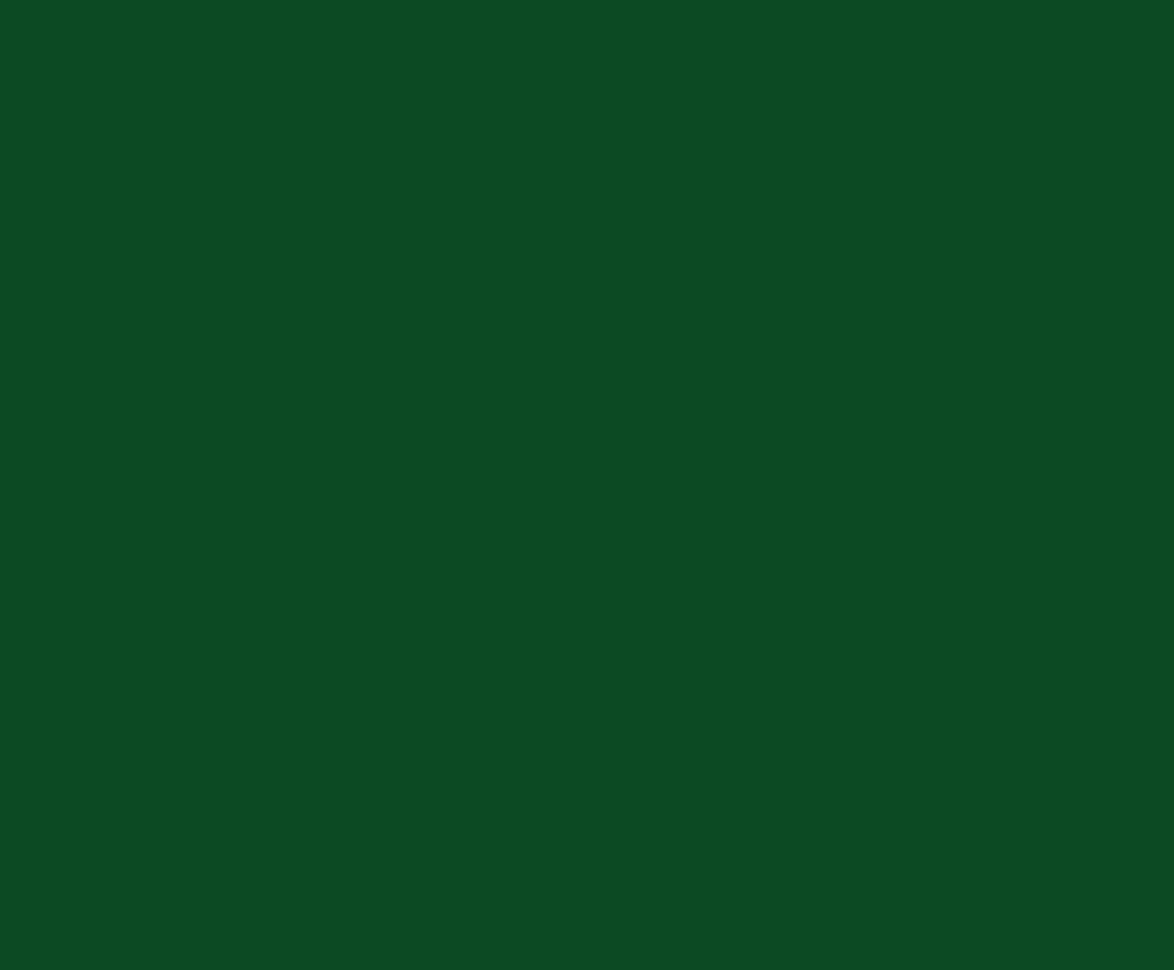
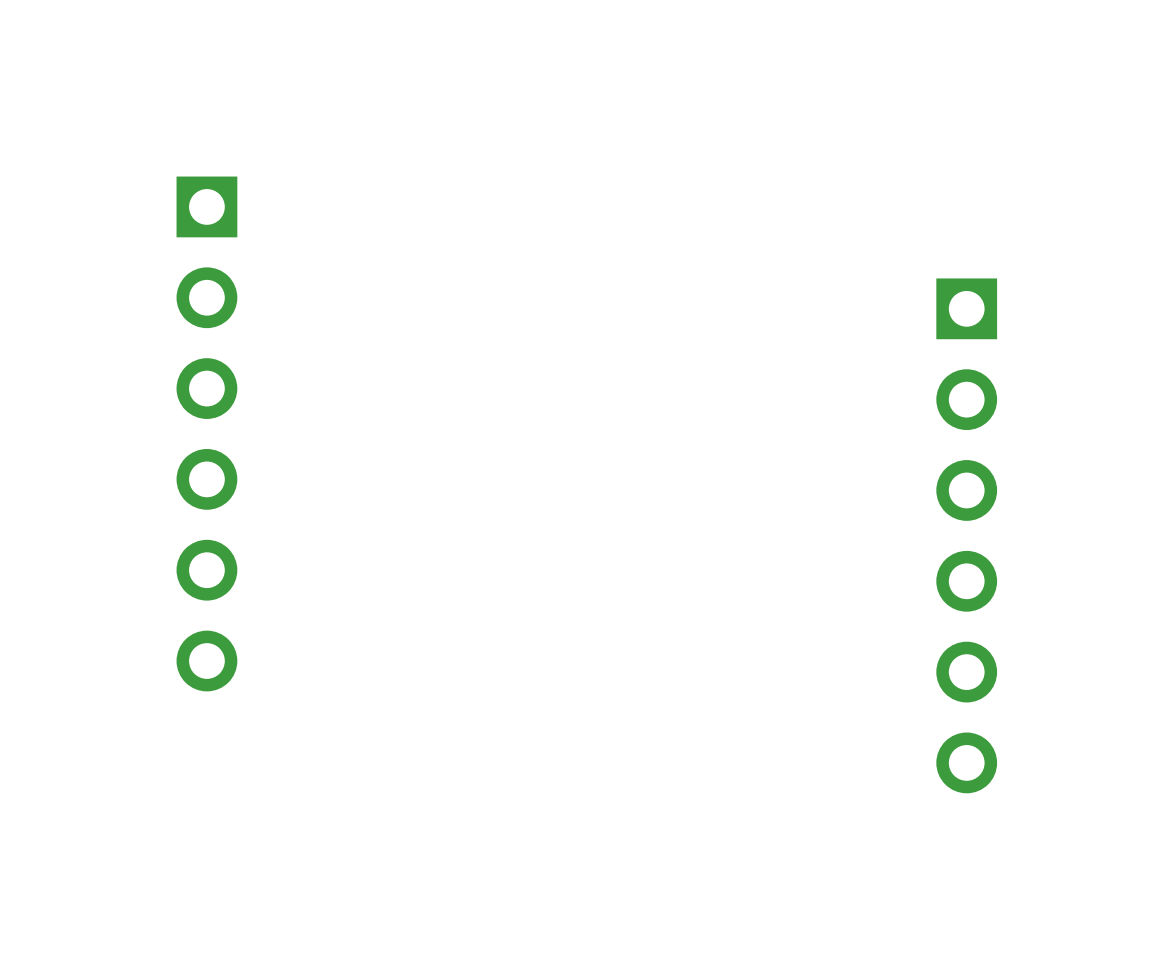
part: none -> (206, 433)
part: none -> (966, 535)

